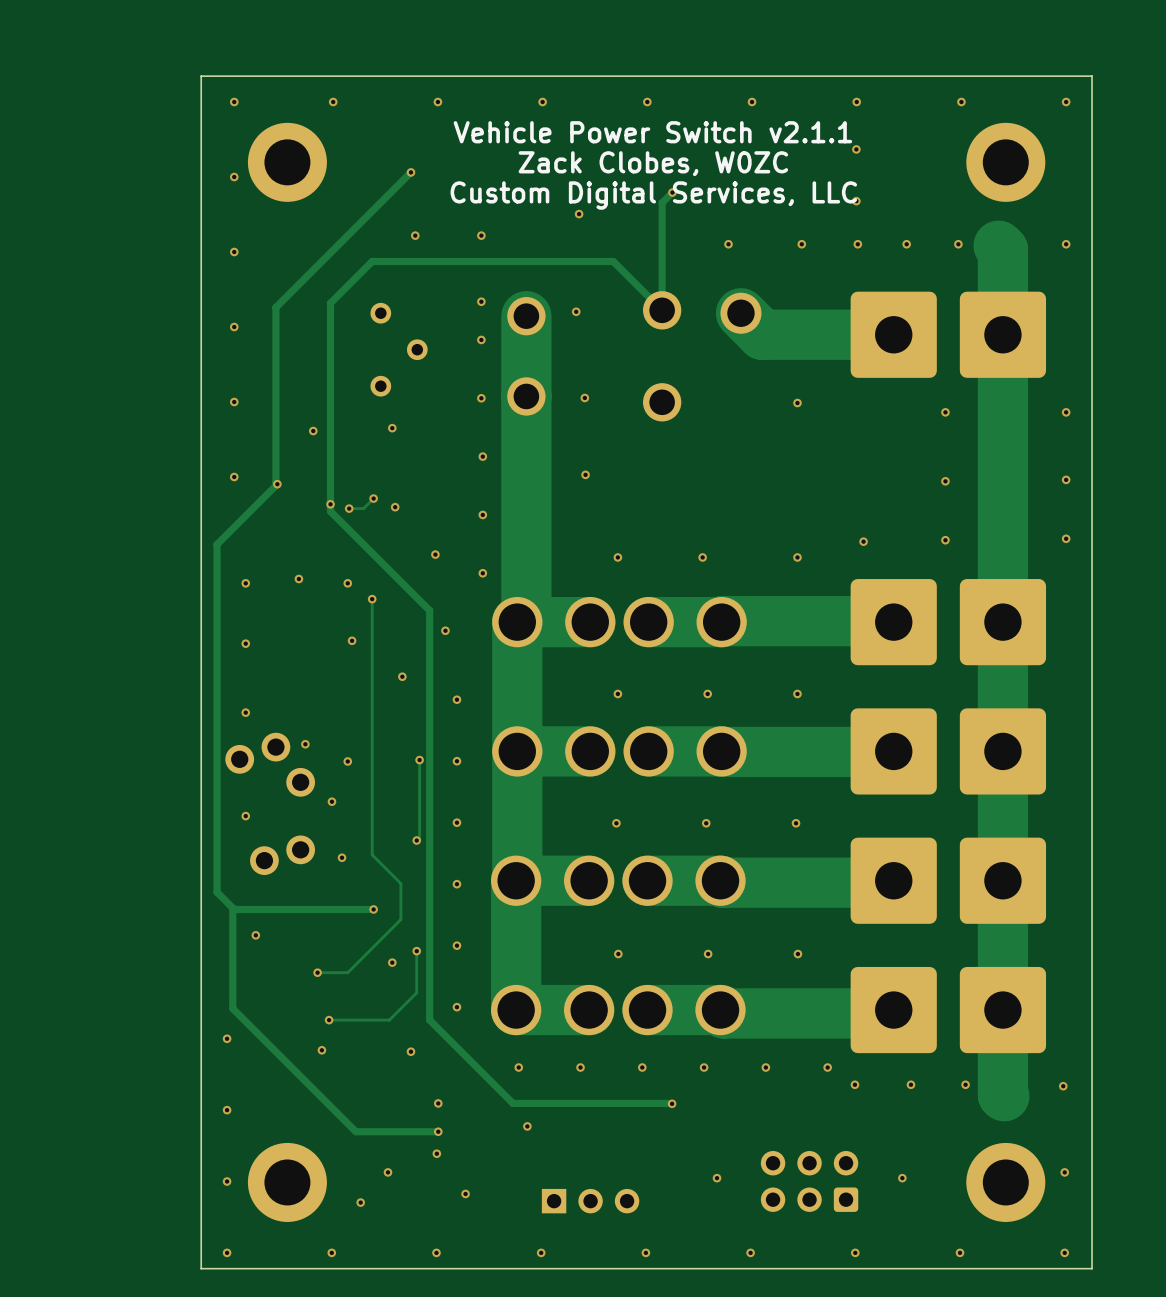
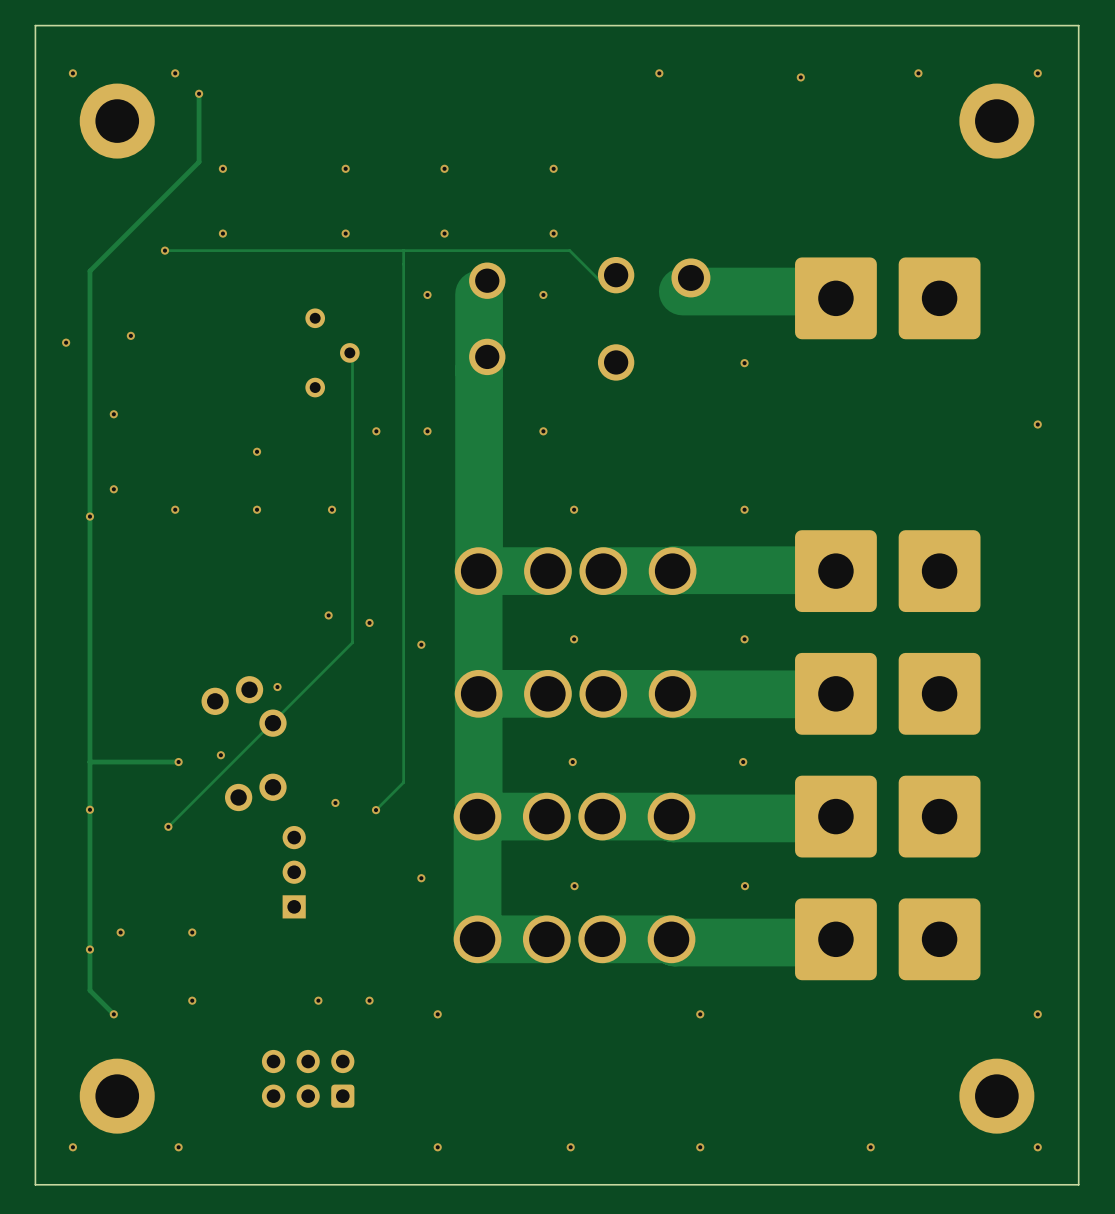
via: none -> (72, 73)
via: none -> (175, 73)
via: none -> (659, 73)
via: (234, 102) -> none
via: (333, 102) -> none
via: (437, 102) -> none
via: (542, 102) -> none
via: (647, 102) -> none
via: (752, 102) -> none
via position: (961, 102) -> (918, 73)
via position: (1066, 102) -> (1037, 73)
track: none -> (199, 93) (199, 161) (89, 271) (89, 990) (113, 1014)
via: none -> (199, 93)
text: Vehicle Power Switch v2.1.1 (652, 132) -> none
via: (856, 149) -> none
part position: (287, 162) -> (117, 121)
part position: (1005, 162) -> (996, 121)
text: Zack Clobes, W0ZC (653, 163) -> none
track: (410, 172) (275, 307) (277, 484) (217, 544) (217, 892) (232, 908) (232, 1008) (355, 1131) (438, 1131) -> none
via: (410, 172) -> none
via position: (234, 177) -> (222, 168)
track: (672, 192) (662, 202) (662, 310) (613, 261) (372, 261) (330, 303) (330, 511) (429, 610) (429, 1020) (512, 1103) (672, 1103) -> none
via: (672, 192) -> none
text: Custom Digital Services, LLC (653, 195) -> none
via: none -> (345, 168)
via: none -> (444, 168)
via: (856, 201) -> none
via position: (579, 214) -> (553, 168)
via: (415, 235) -> none
via: (481, 235) -> none
via: (728, 244) -> none
via: (801, 244) -> none
via: (857, 244) -> none
via: (906, 244) -> none
via: (958, 244) -> none
via: (1066, 244) -> none
track: (998, 245) (1002, 249) (1004, 1096) -> none
via position: (234, 252) -> (222, 233)
via: none -> (345, 233)
via: none -> (444, 233)
via: none -> (553, 233)
track: none -> (164, 250) (569, 250) (607, 288)
via: none -> (164, 250)
track: none -> (403, 250) (403, 782) (376, 810)
via: (481, 301) -> none
via position: (576, 311) -> (543, 294)
track: (740, 313) (762, 334) (893, 334) -> none
track: (526, 316) (526, 613) (517, 622) -> none
via: (234, 327) -> none
track: none -> (835, 291) (682, 291)
track: none -> (479, 294) (479, 570)
via: none -> (427, 294)
via: (481, 339) -> none
part position: (399, 349) -> (332, 352)
via: none -> (130, 335)
via: none -> (66, 342)
track: none -> (349, 352) (352, 355) (352, 642) (168, 826)
via: (584, 397) -> none
via: (481, 398) -> none
via: (234, 402) -> none
via: (945, 412) -> none
via: (1066, 412) -> none
via: (392, 428) -> none
via: (313, 431) -> none
via: none -> (113, 414)
via: (482, 456) -> none
via: none -> (1037, 424)
via: none -> (376, 431)
via: none -> (427, 431)
via: (234, 477) -> none
via: (1066, 479) -> none
via: (945, 481) -> none
via position: (277, 484) -> (257, 451)
track: (373, 498) (363, 508) (349, 508) -> none
via: (373, 498) -> none
via: (330, 504) -> none
via: (395, 507) -> none
via: (349, 508) -> none
via: (482, 514) -> none
via: none -> (113, 489)
via: (1066, 538) -> none
via: (945, 540) -> none
via: (863, 541) -> none
via: (435, 554) -> none
via: none -> (175, 509)
via: none -> (257, 509)
via: none -> (332, 509)
via: (702, 557) -> none
via: none -> (89, 516)
via: (482, 573) -> none
via: (298, 579) -> none
via: (245, 583) -> none
via: (347, 583) -> none
track: (372, 599) (372, 854) (400, 883) (400, 919) (347, 972) (317, 972) -> none
via: (372, 599) -> none
via: (445, 630) -> none
via position: (352, 640) -> (328, 615)
via: (245, 643) -> none
via: (707, 693) -> none
via: (245, 712) -> none
track: (419, 760) (419, 837) (416, 840) -> none
via: (419, 760) -> none
via: (347, 761) -> none
via: (456, 761) -> none
via: (331, 801) -> none
via: (456, 822) -> none
track: none -> (178, 762) (89, 762)
via: none -> (178, 762)
via: (706, 823) -> none
via: (416, 840) -> none
via: (342, 857) -> none
via: none -> (335, 802)
via: none -> (89, 809)
via: none -> (376, 810)
via: (456, 884) -> none
via: none -> (168, 826)
track: (233, 908) (373, 909) -> none
via: (373, 909) -> none
via: (255, 935) -> none
part: none -> (294, 872)
track: (416, 951) (416, 992) (389, 1020) (329, 1020) -> none
via: (416, 951) -> none
via: (708, 954) -> none
via: (392, 962) -> none
via: (317, 972) -> none
via: none -> (120, 932)
via: none -> (192, 932)
via: (456, 1007) -> none
via: none -> (89, 949)
via: (329, 1020) -> none
via: (227, 1038) -> none
via: (321, 1050) -> none
via: (410, 1051) -> none
via: (518, 1067) -> none
via: (580, 1067) -> none
via: (642, 1067) -> none
via: (704, 1067) -> none
via: (765, 1067) -> none
via: (827, 1067) -> none
via: none -> (192, 1000)
via: none -> (318, 1000)
via: none -> (369, 1000)
via: (854, 1084) -> none
via: (910, 1084) -> none
via: (965, 1084) -> none
via position: (1063, 1086) -> (1037, 1014)
via: none -> (113, 1014)
via: none -> (437, 1014)
via: none -> (700, 1014)
via: (438, 1103) -> none
via: (672, 1103) -> none
via: (227, 1110) -> none
via: (527, 1126) -> none
via: (438, 1131) -> none
via: (436, 1153) -> none
part: none -> (308, 1078)
via: (387, 1172) -> none
via: (1064, 1172) -> none
via: (717, 1178) -> none
via: (902, 1178) -> none
via: (227, 1181) -> none
part: (809, 1181) -> none
part position: (287, 1182) -> (117, 1096)
part position: (1005, 1182) -> (996, 1096)
via: (465, 1193) -> none
part: (590, 1201) -> none
via: (360, 1202) -> none
via: none -> (72, 1147)
via: none -> (178, 1147)
via: none -> (437, 1147)
via: none -> (570, 1147)
via: none -> (870, 1147)
via: none -> (1037, 1147)
via: (227, 1252) -> none
via: (331, 1252) -> none
via: (436, 1252) -> none
via: (541, 1252) -> none
via: (645, 1252) -> none
via position: (750, 1252) -> (700, 1147)
via: (855, 1252) -> none
via: (960, 1252) -> none
via: (1064, 1252) -> none
board edge: (1092, 1268) (1092, 76) (201, 76) (201, 1268) -> (1024, 1184) (1078, 1184) (1078, 25) (35, 25) (35, 1184) (178, 1184)

